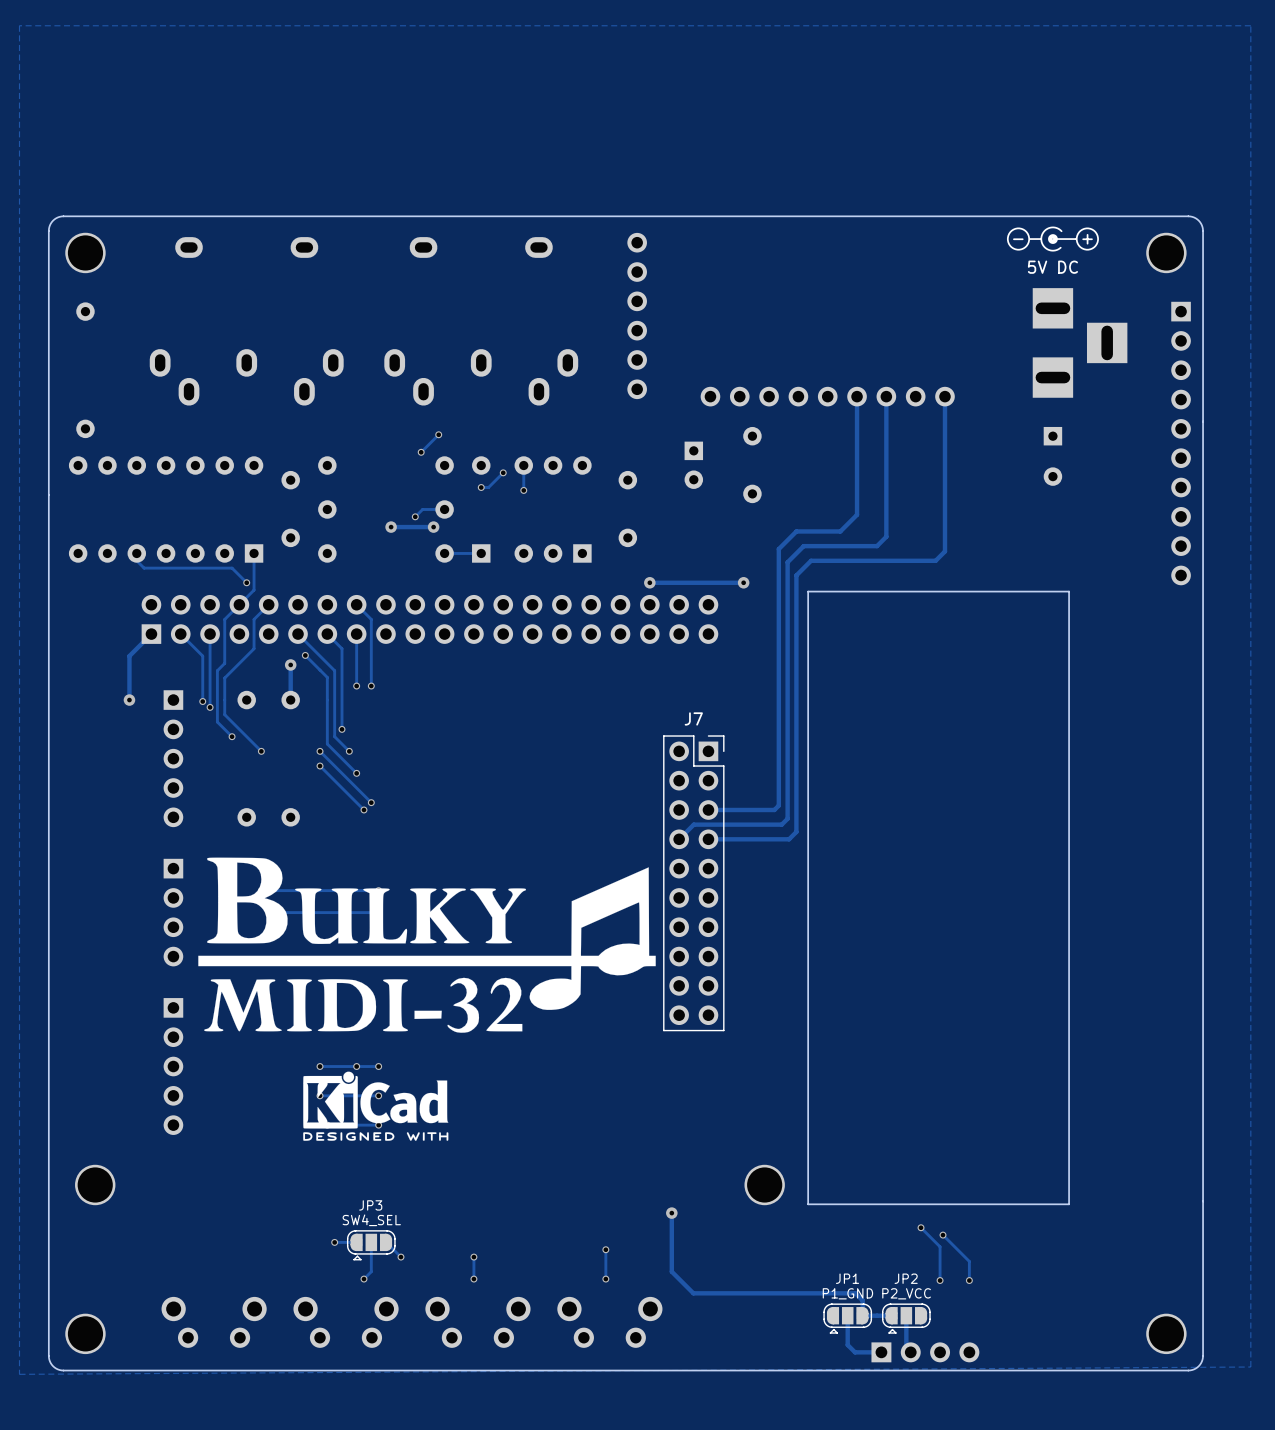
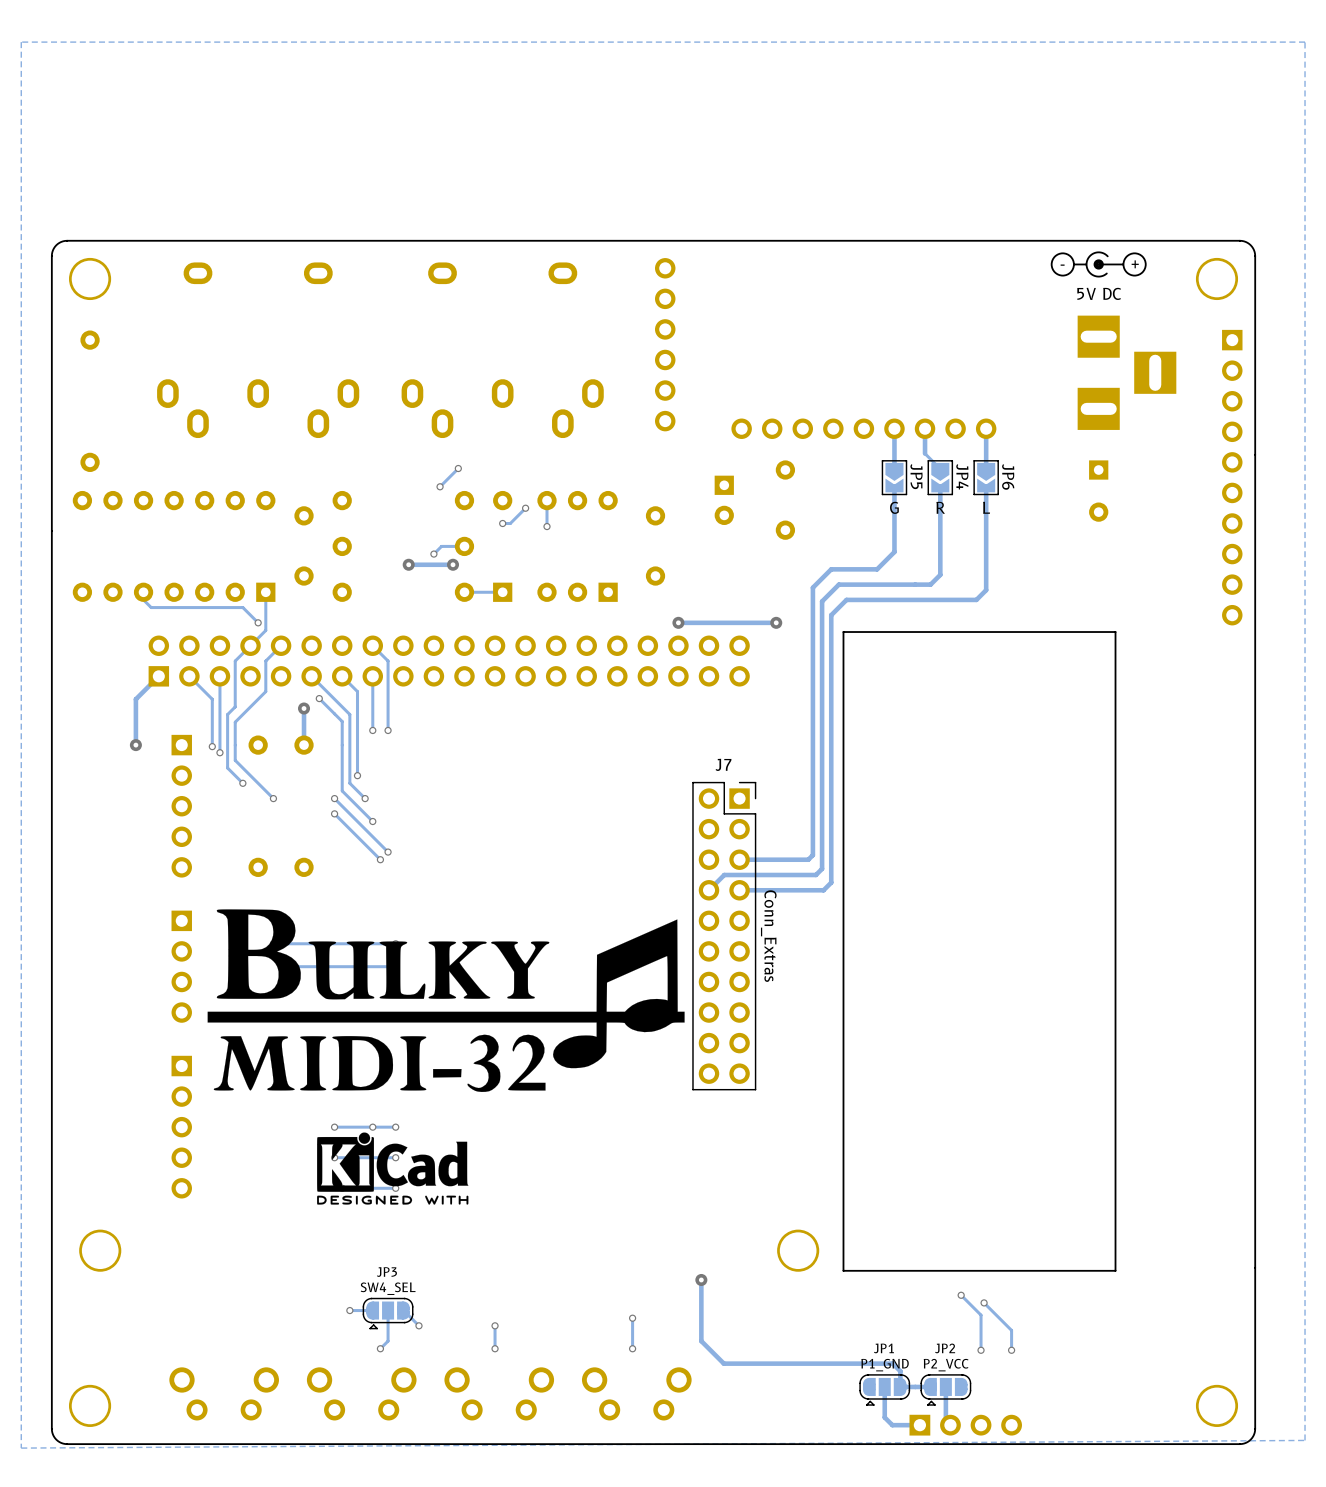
track: (886, 420) (886, 536) (877, 546) -> (940, 486) (940, 574) (930, 584) (915, 584)
track: none -> (925, 453) (940, 468)
track: (857, 435) (857, 451) -> none
track: (944, 435) (944, 451) -> none
JP5: none -> G (894, 477)
JP4: none -> R (940, 477)
JP6: none -> L (986, 477)
J7 value: none -> Conn_Extras (768, 936)

